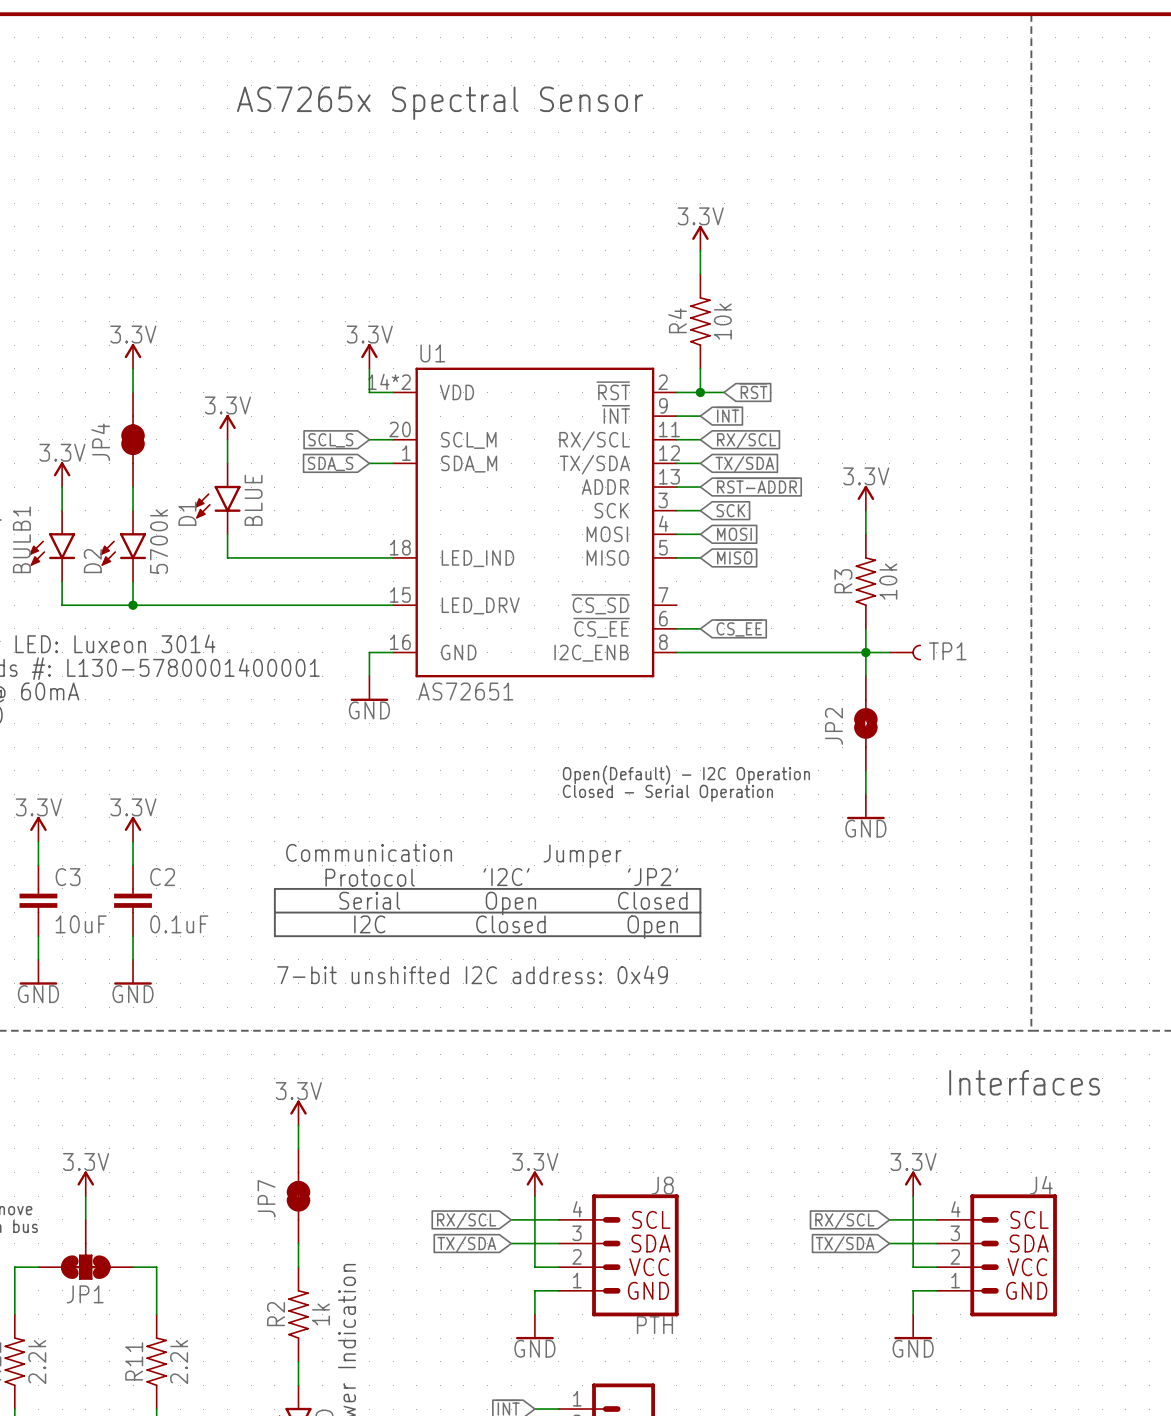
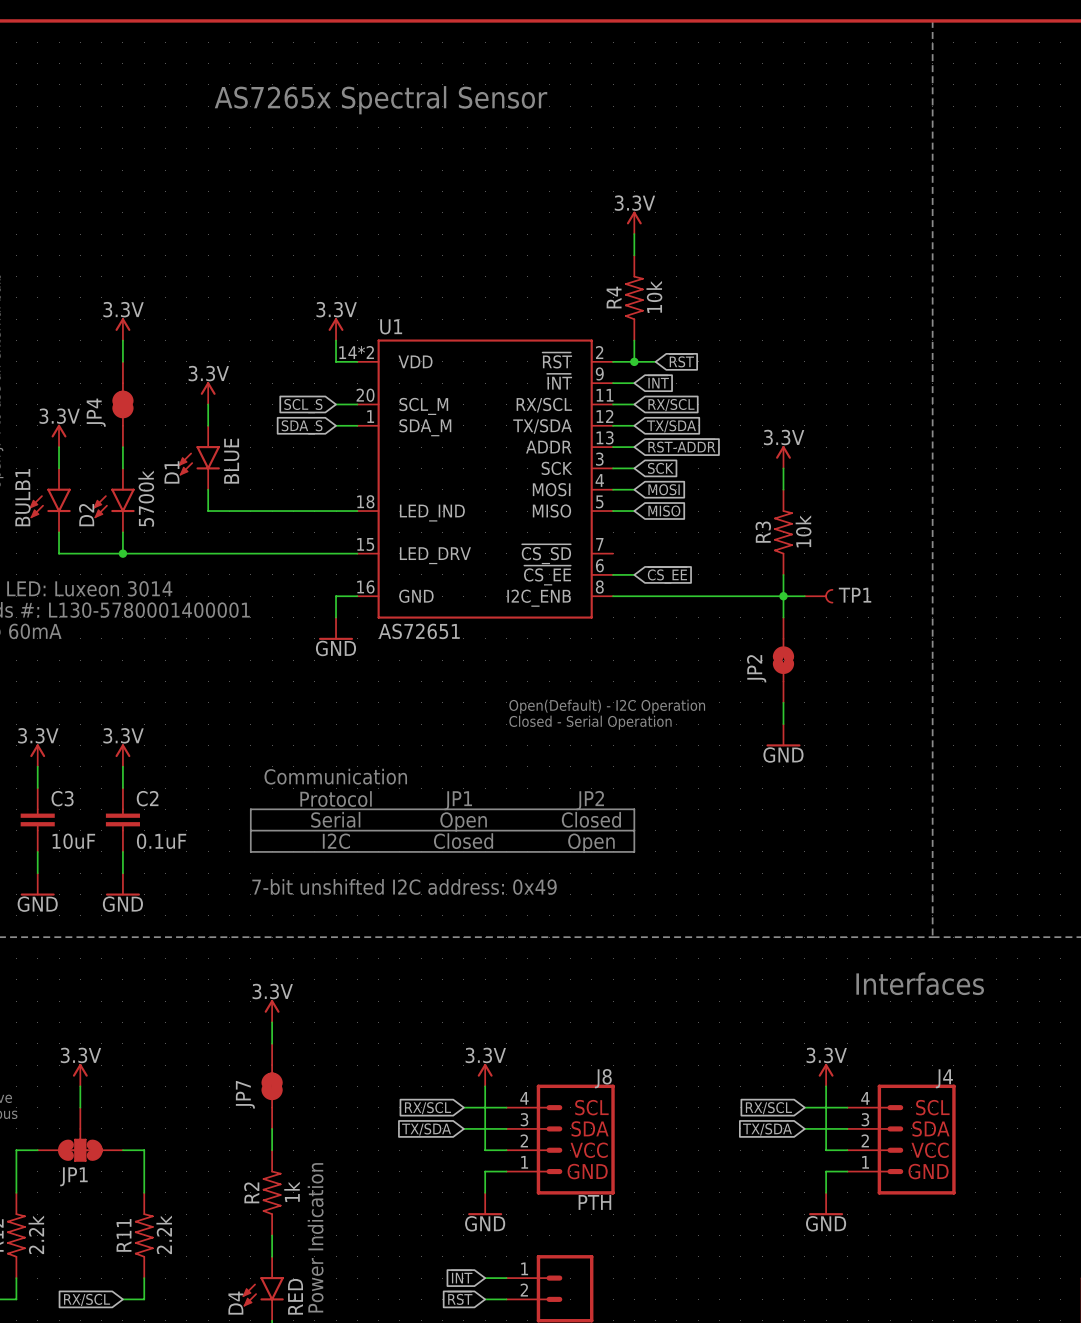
text: Jumper (582, 856) -> none
text: 'I2C' (506, 877) -> JP1 (458, 800)
text: 'JP2' (653, 877) -> JP2 (590, 800)

